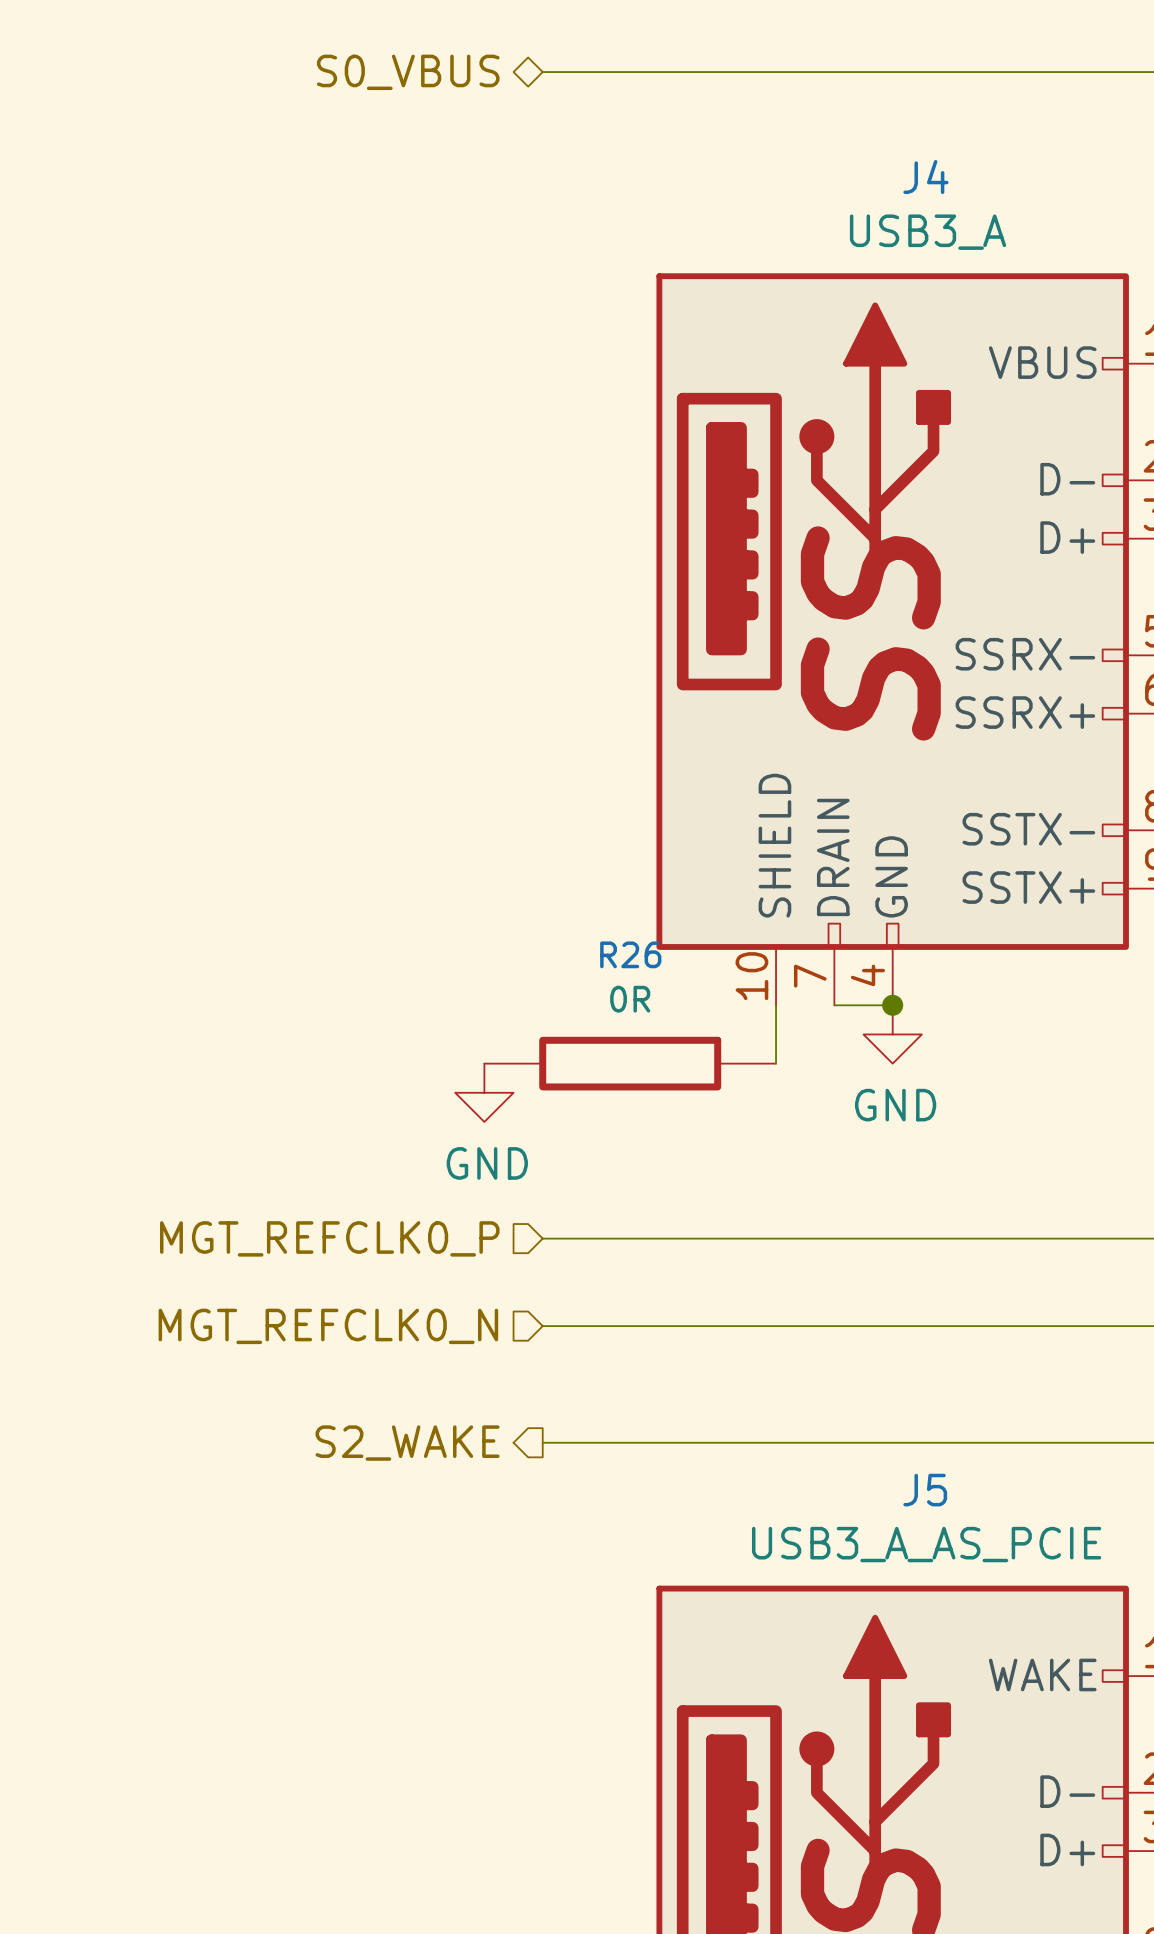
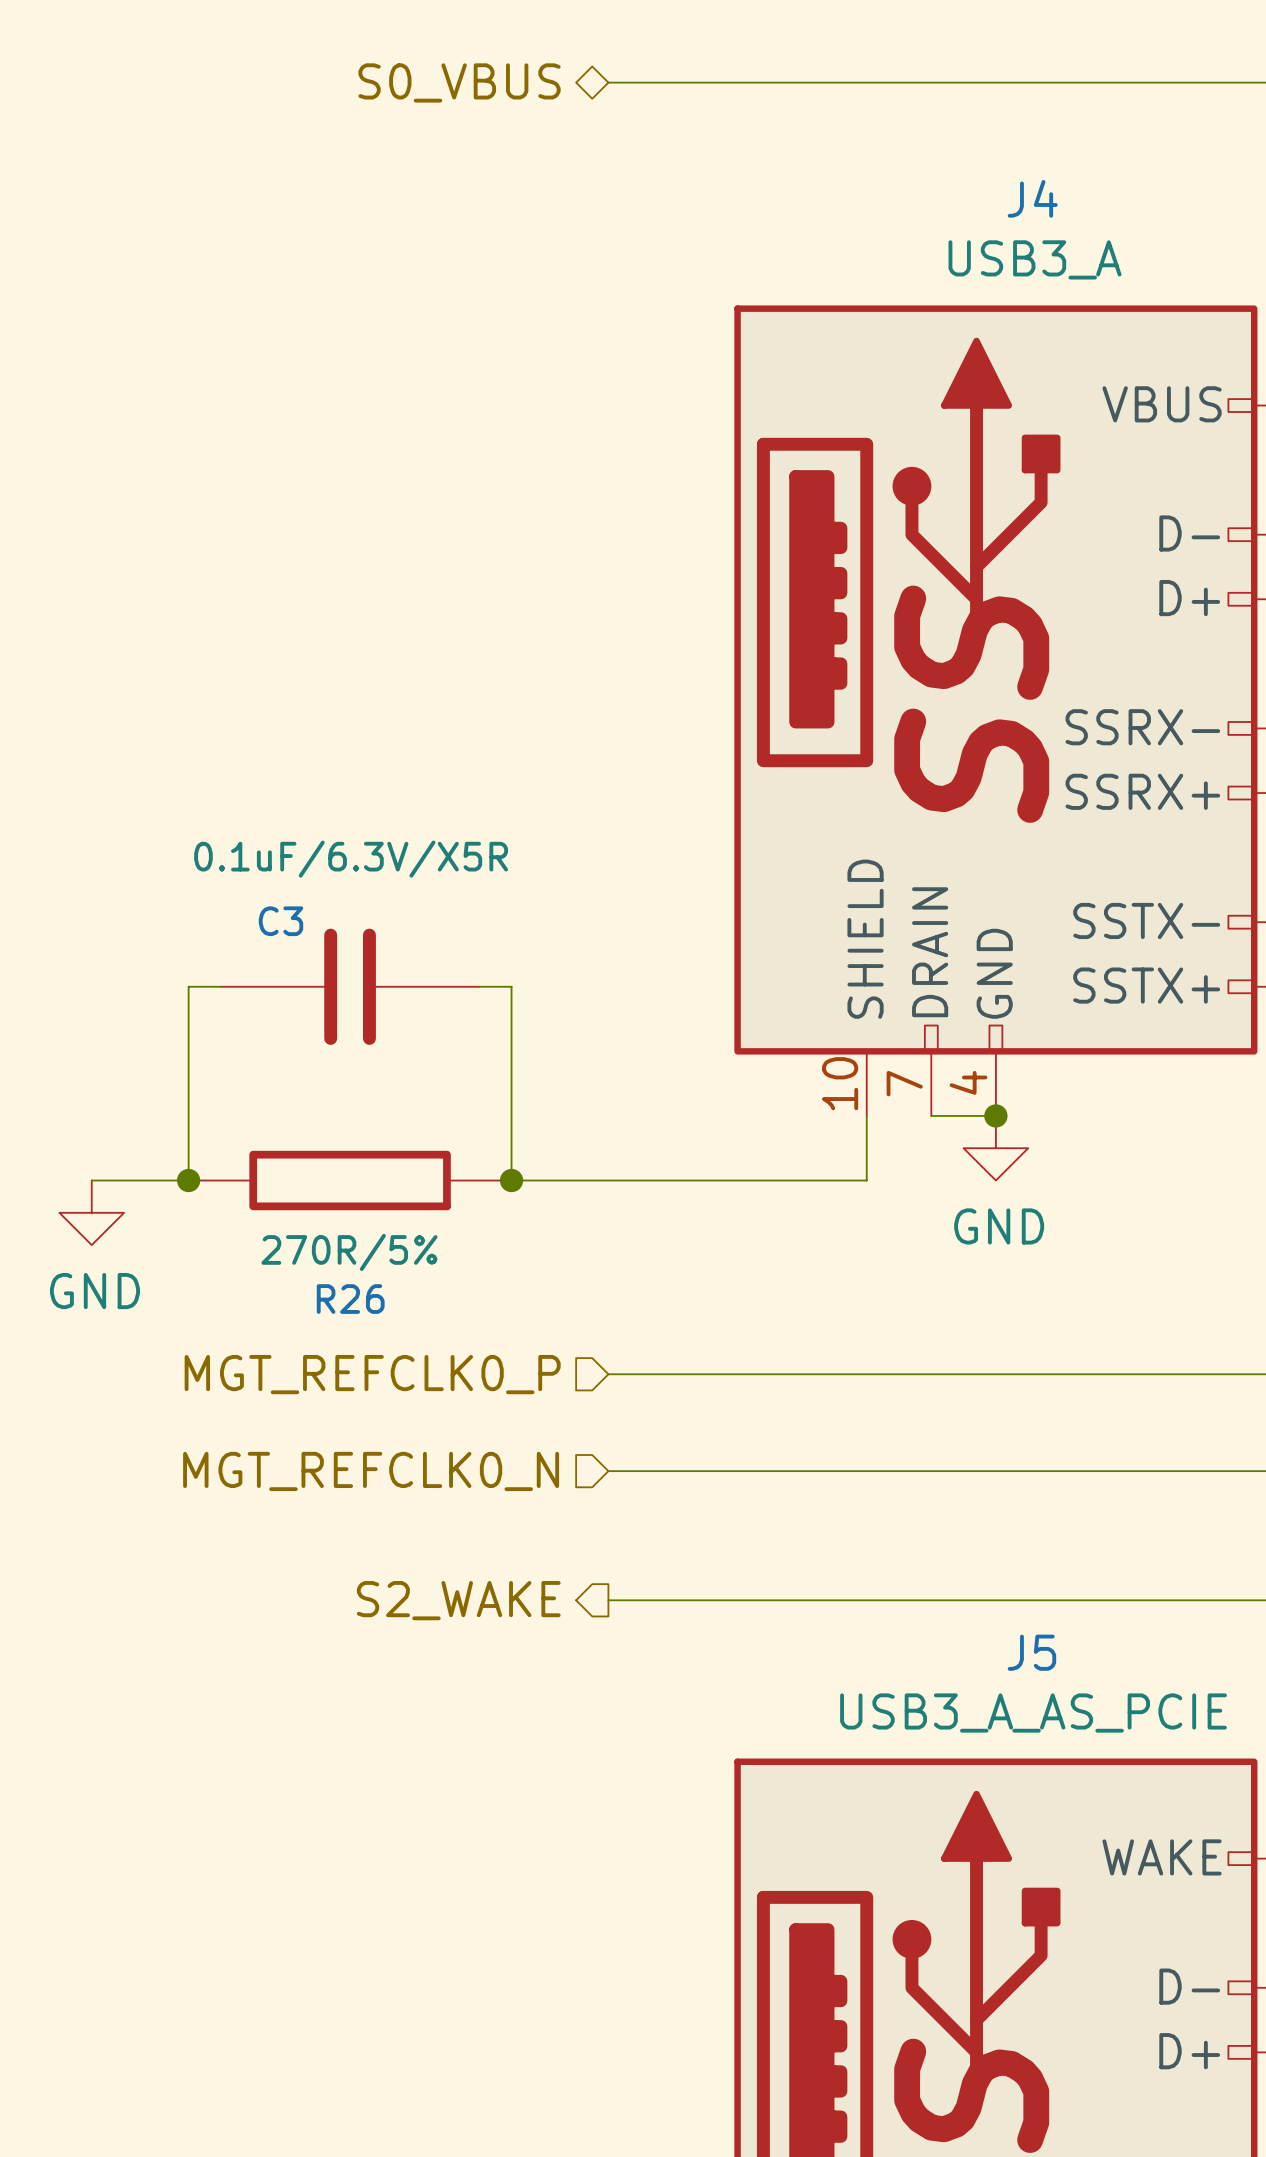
wire: none -> (220, 986) (188, 986) (188, 1180) (91, 1180)
C3: none -> 0.1uF/6.3V/X5R (350, 986)
wire: none -> (479, 986) (511, 986) (511, 1180) (866, 1180)
R26 name position: R26 (630, 954) -> R26 (350, 1299)
R26 value: 0R (630, 999) -> 270R/5% (349, 1252)
junction: none -> (188, 1180)
junction: none -> (511, 1180)
R26 position: (630, 1063) -> (350, 1180)
power symbol position: GND (484, 1092) -> GND (91, 1212)

